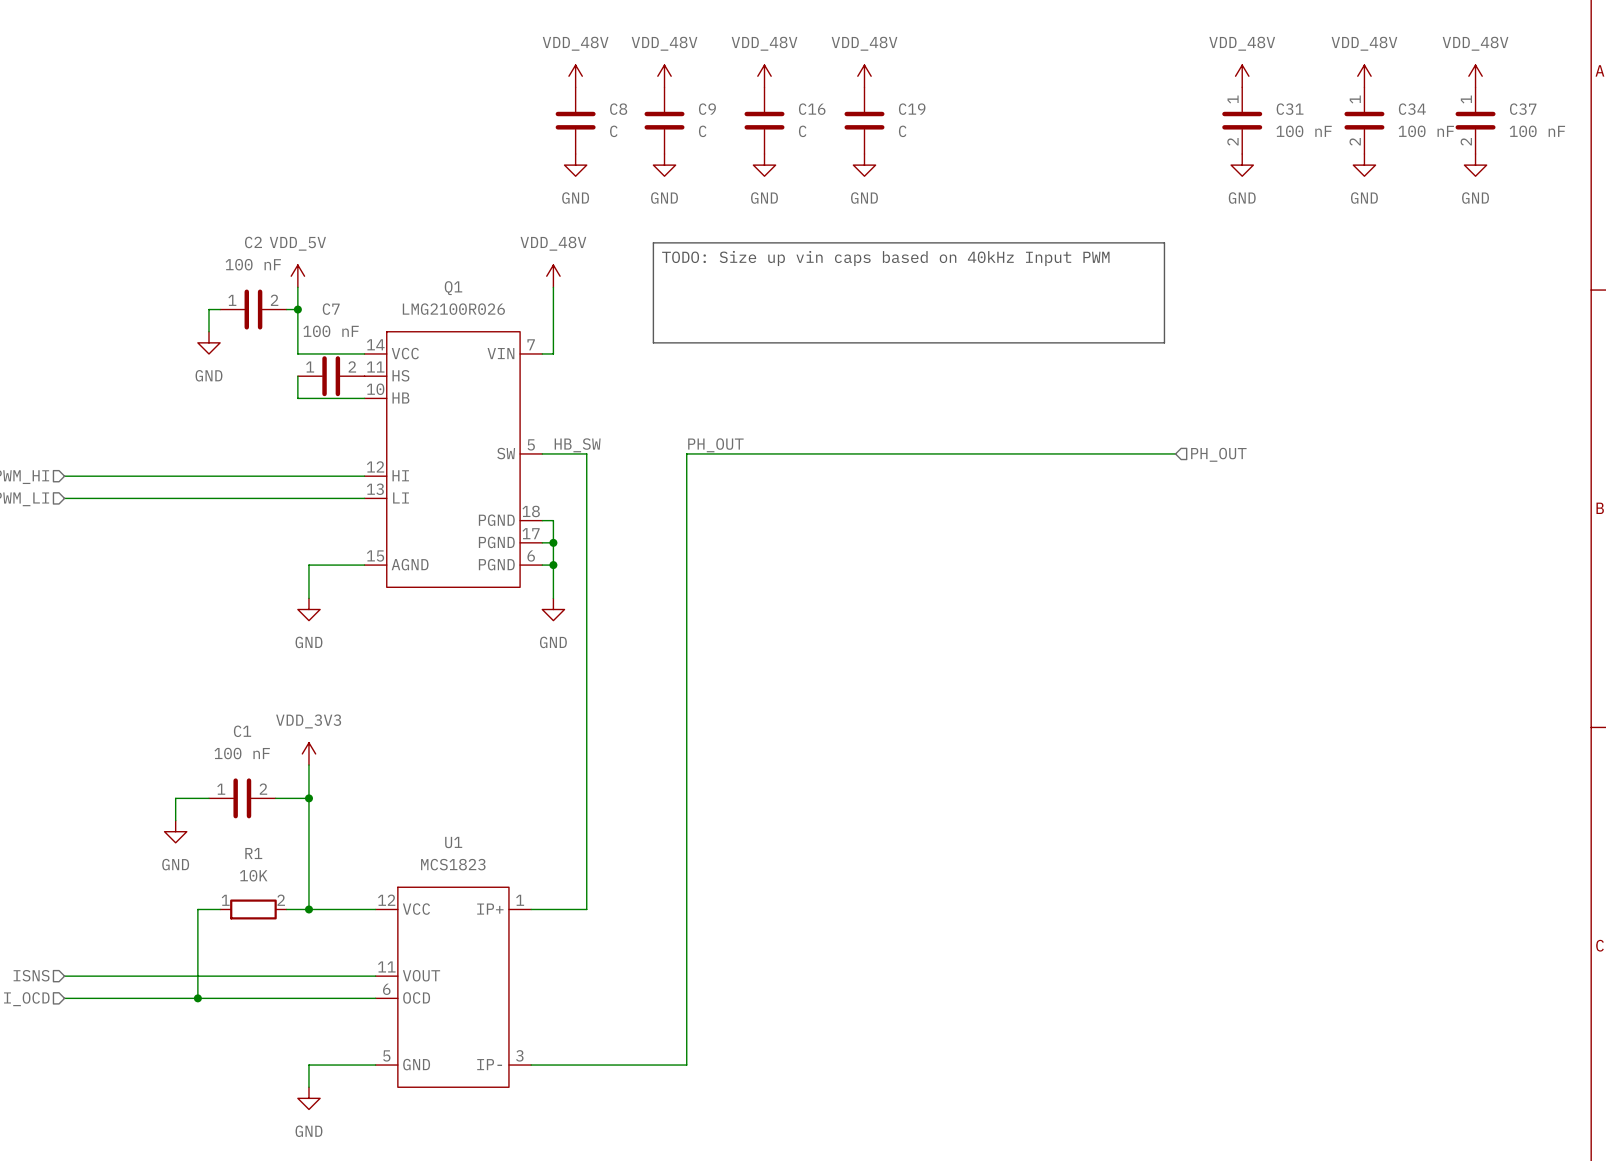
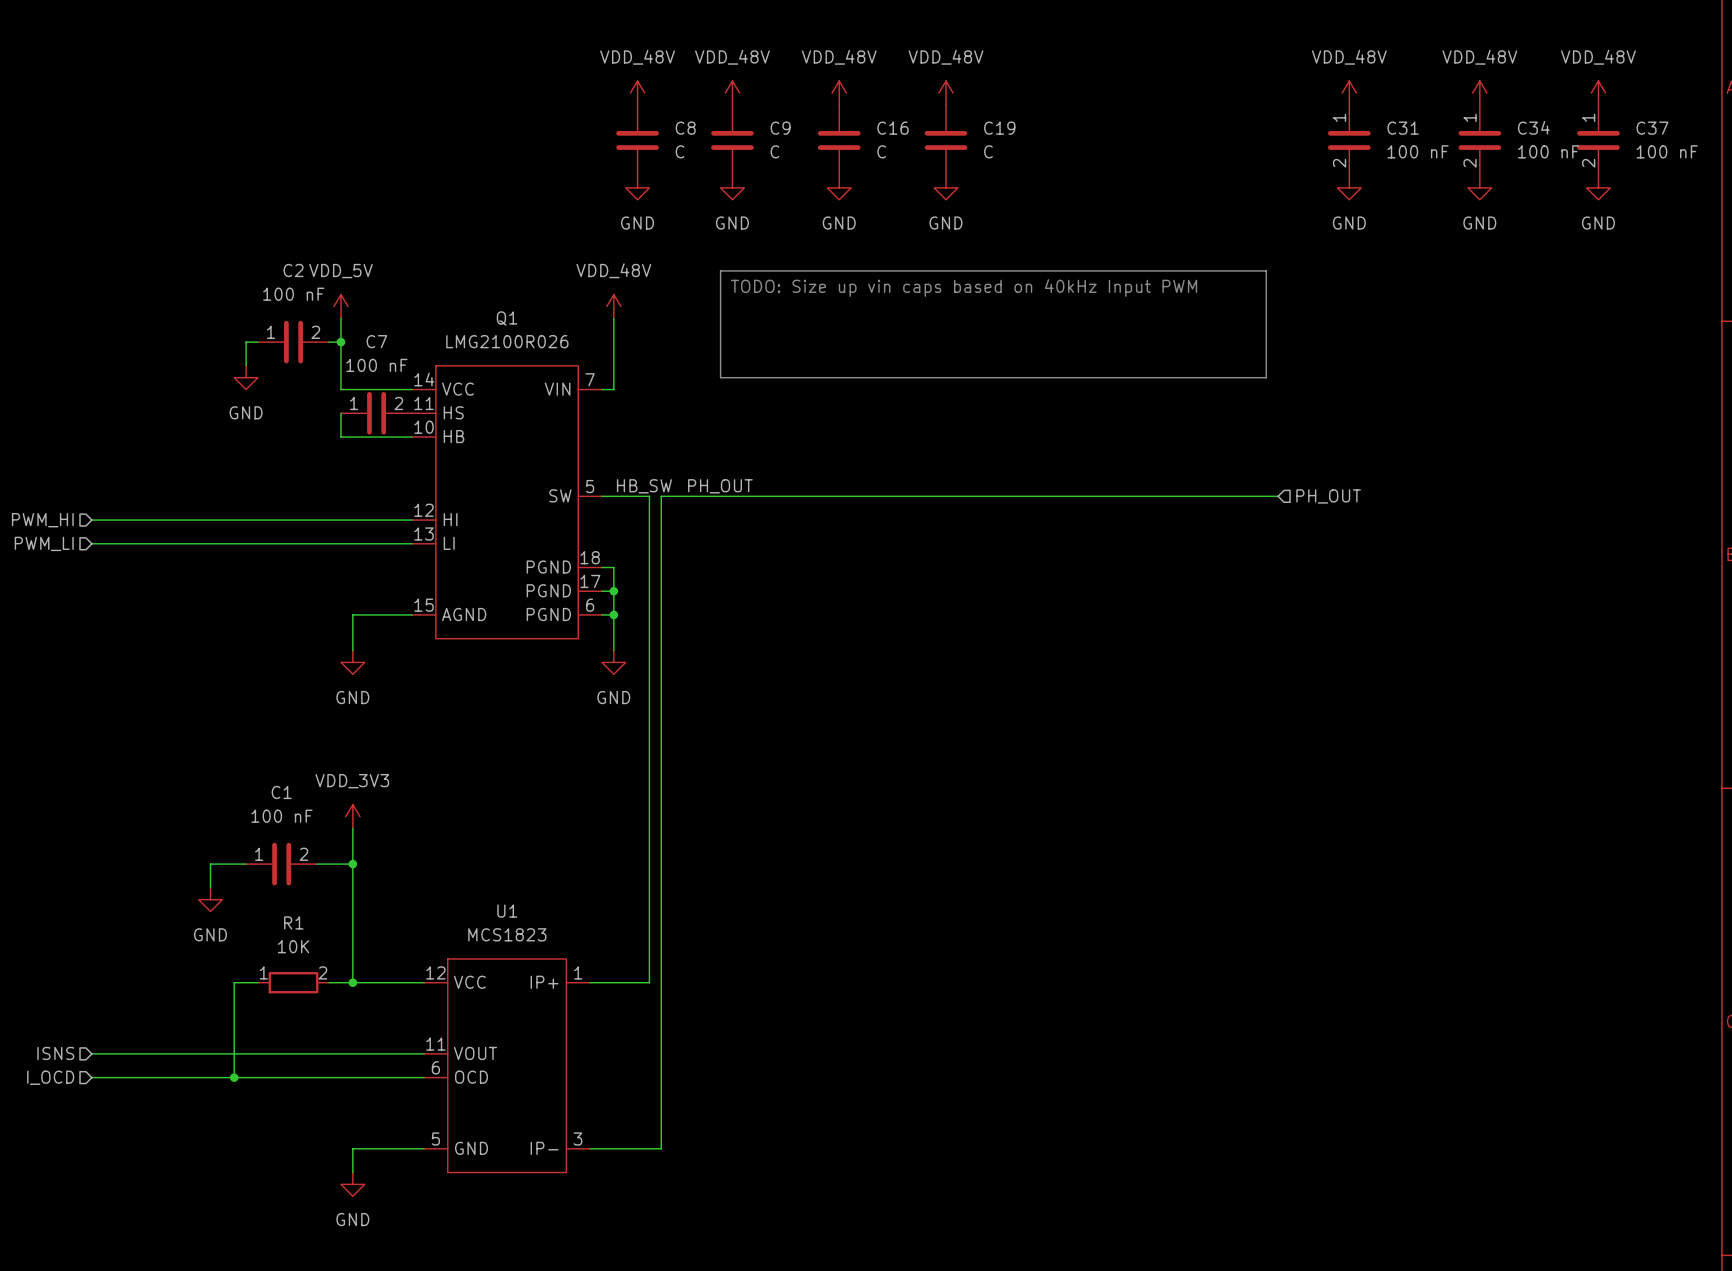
label position: PH_OUT (715, 445) -> PH_OUT (720, 486)
wire: (686, 453) (686, 1065) (597, 1065) -> (756, 496) (661, 496) (661, 1148)

